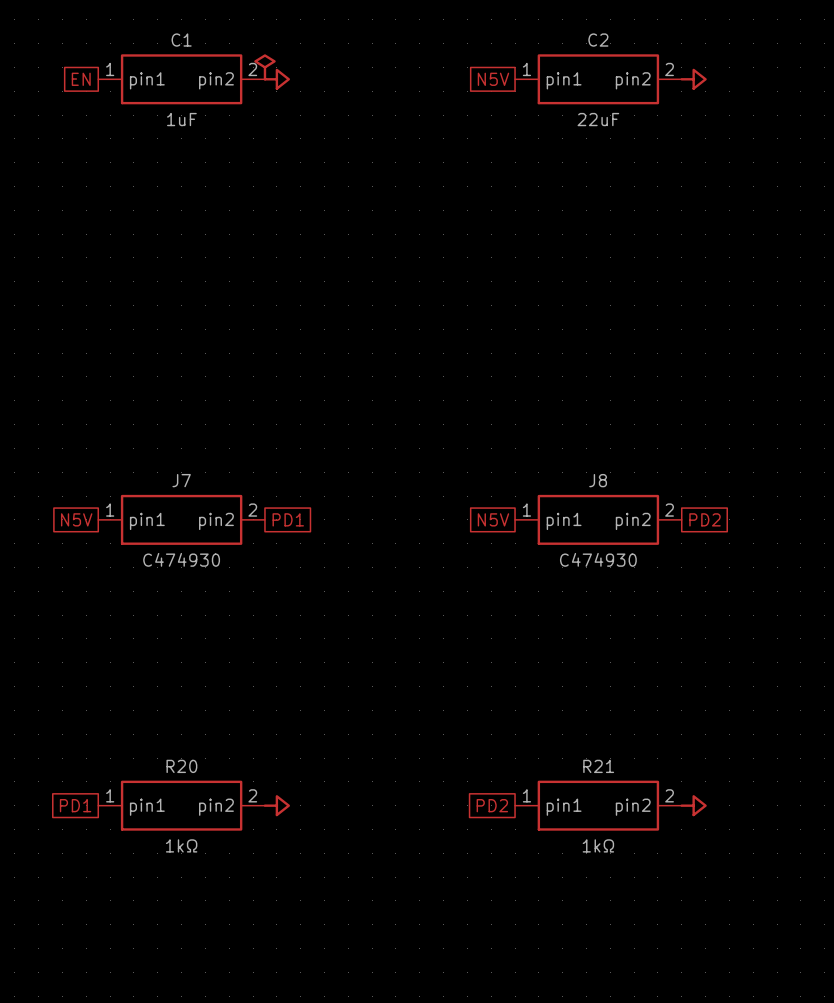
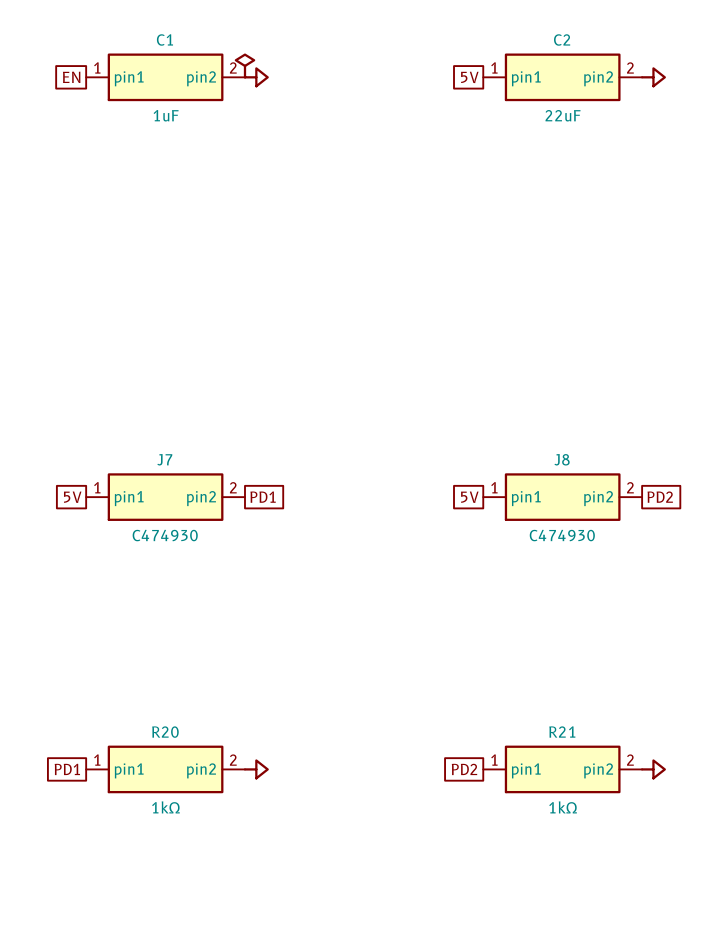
global label: N5V (493, 79) -> 5V (469, 77)
global label: N5V (76, 519) -> 5V (72, 497)
global label: N5V (493, 519) -> 5V (469, 497)

